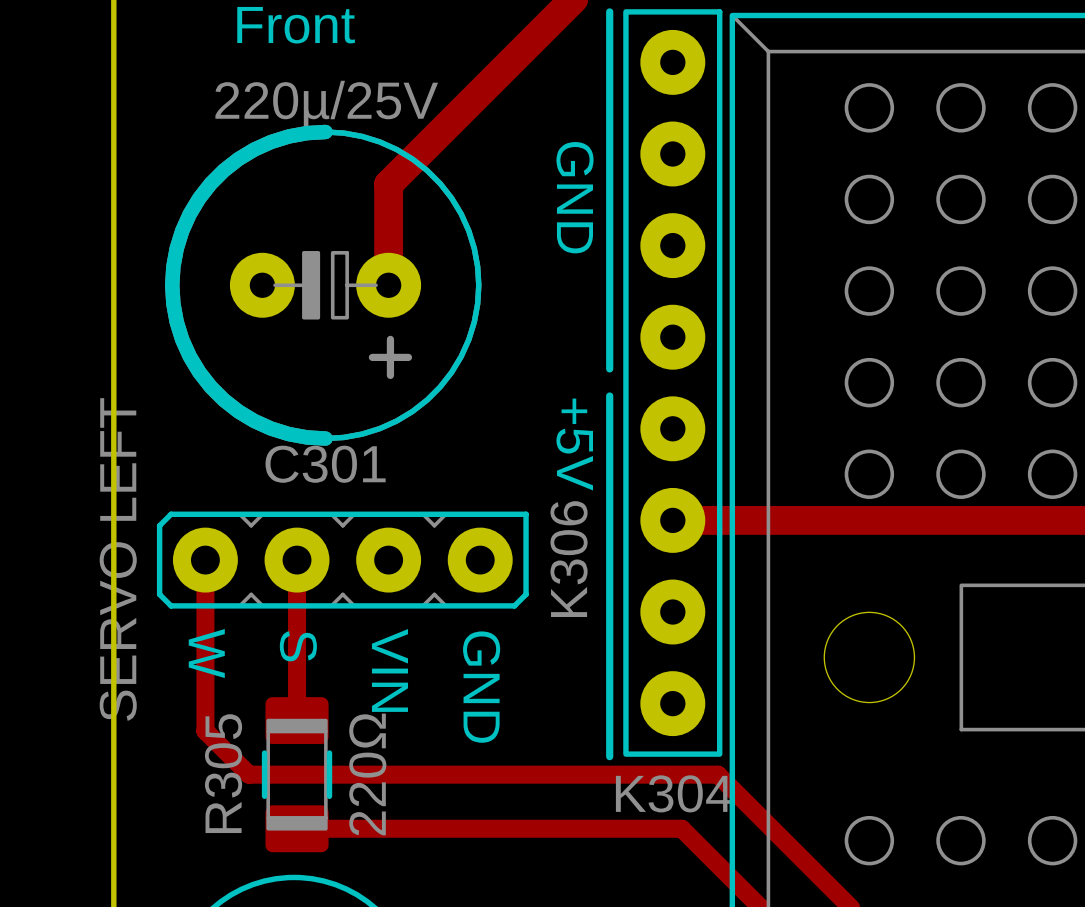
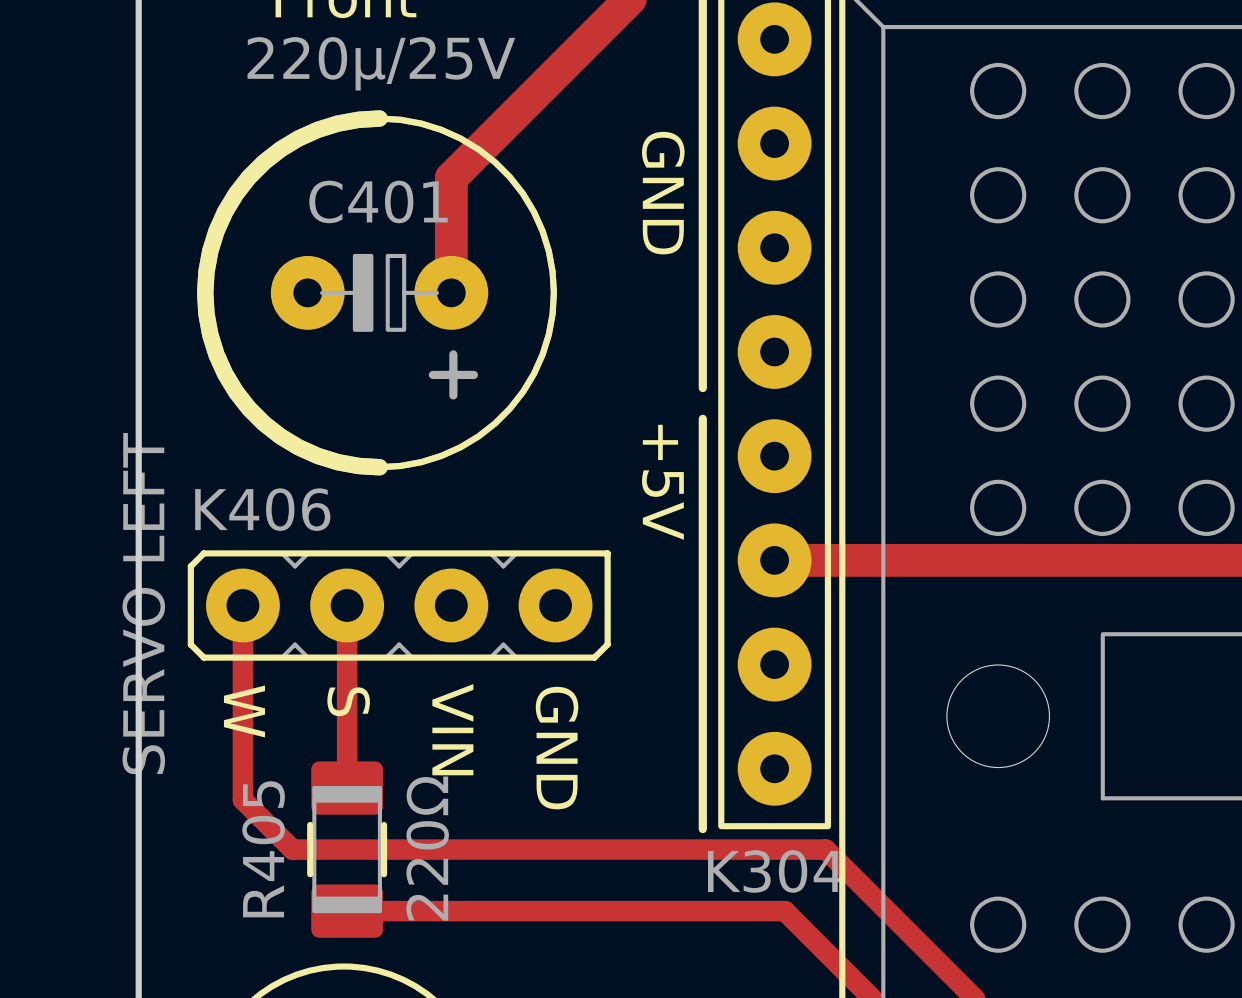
C301 value position: 220µ/25V (326, 105) -> 220µ/25V (381, 63)
C301 name: C301 (325, 464) -> C401 (378, 201)
K306 name: K306 (569, 559) -> K406 (262, 509)
R305 name: R305 (223, 773) -> R405 (263, 849)

